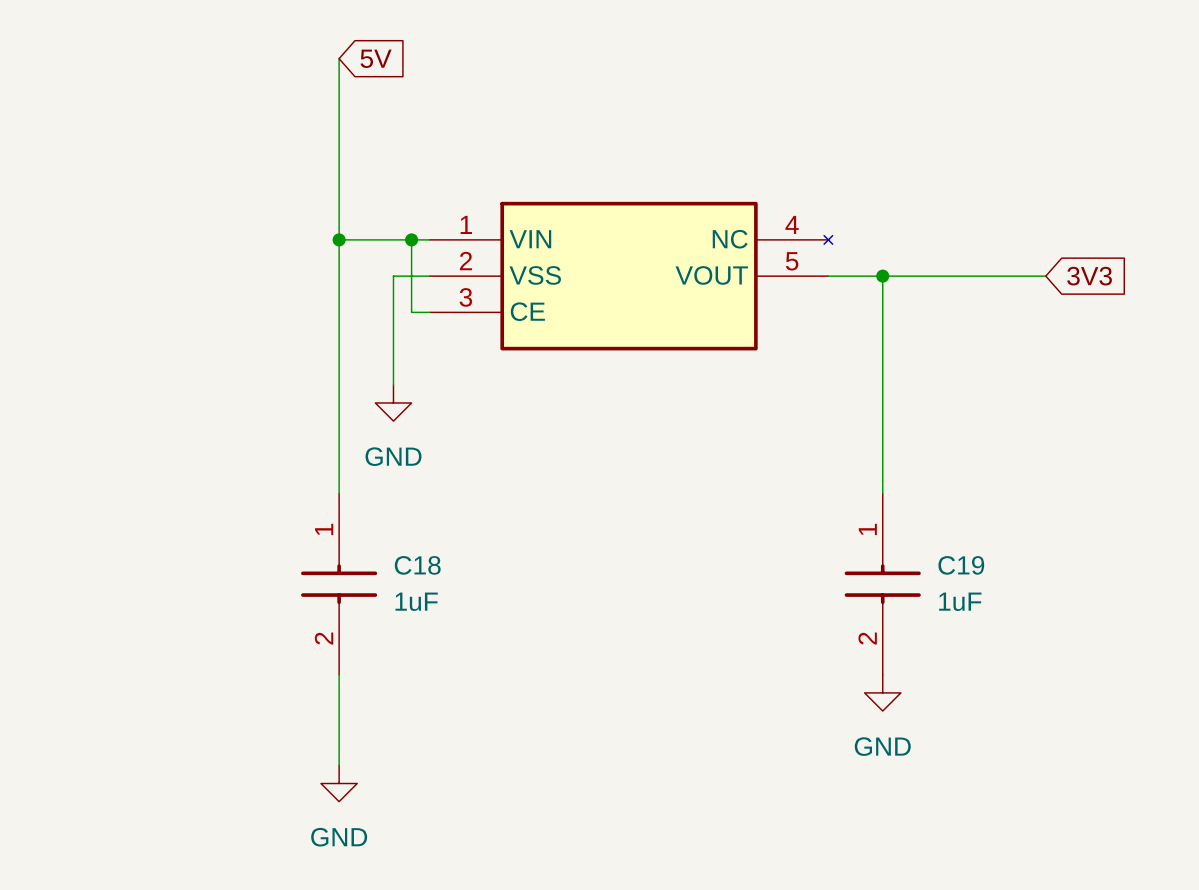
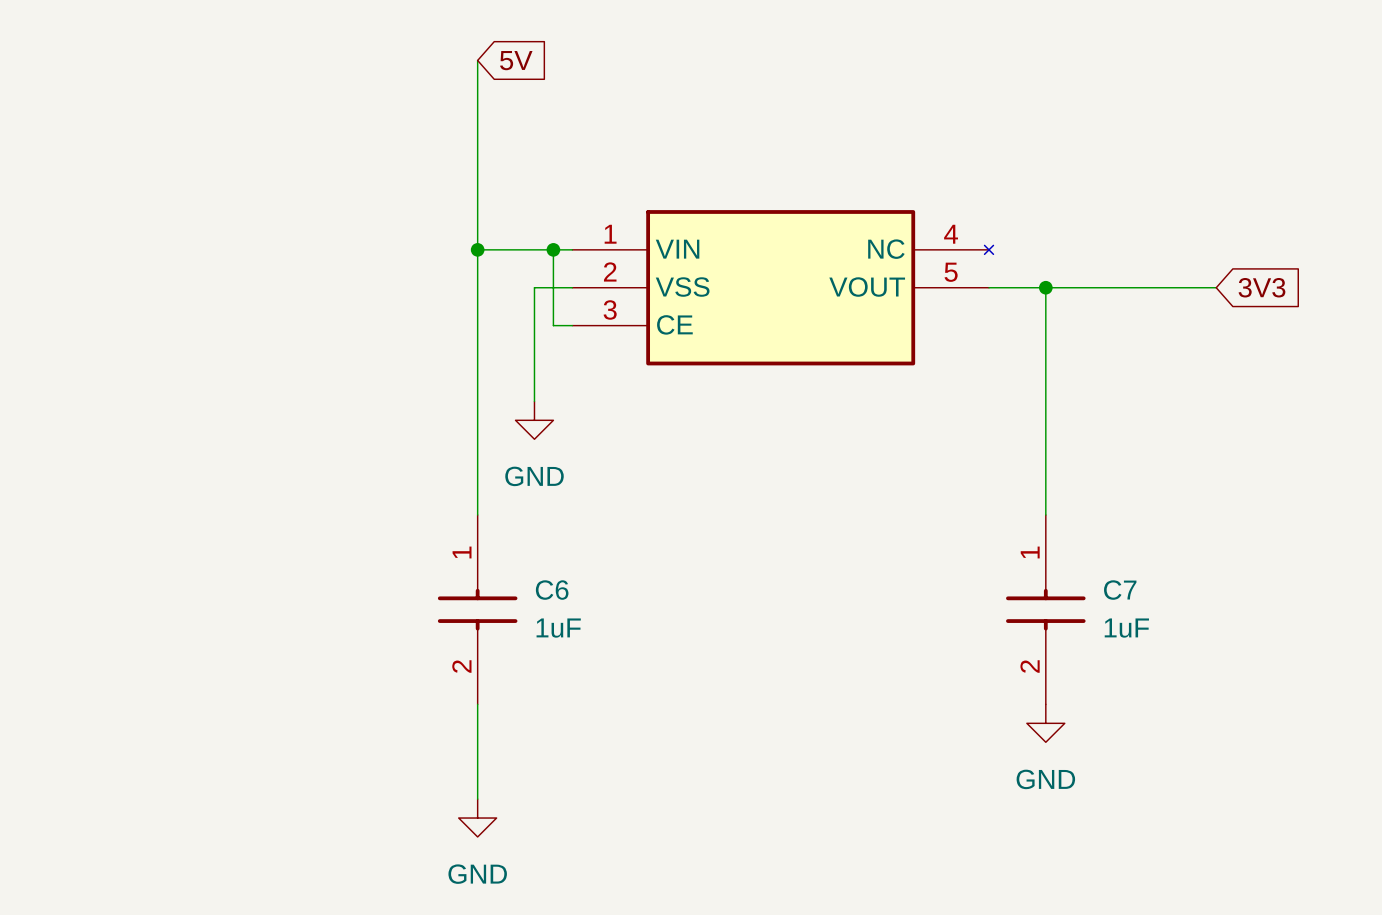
C18 name: C18 (417, 565) -> C6 (552, 590)
C19 name: C19 (961, 565) -> C7 (1120, 590)

